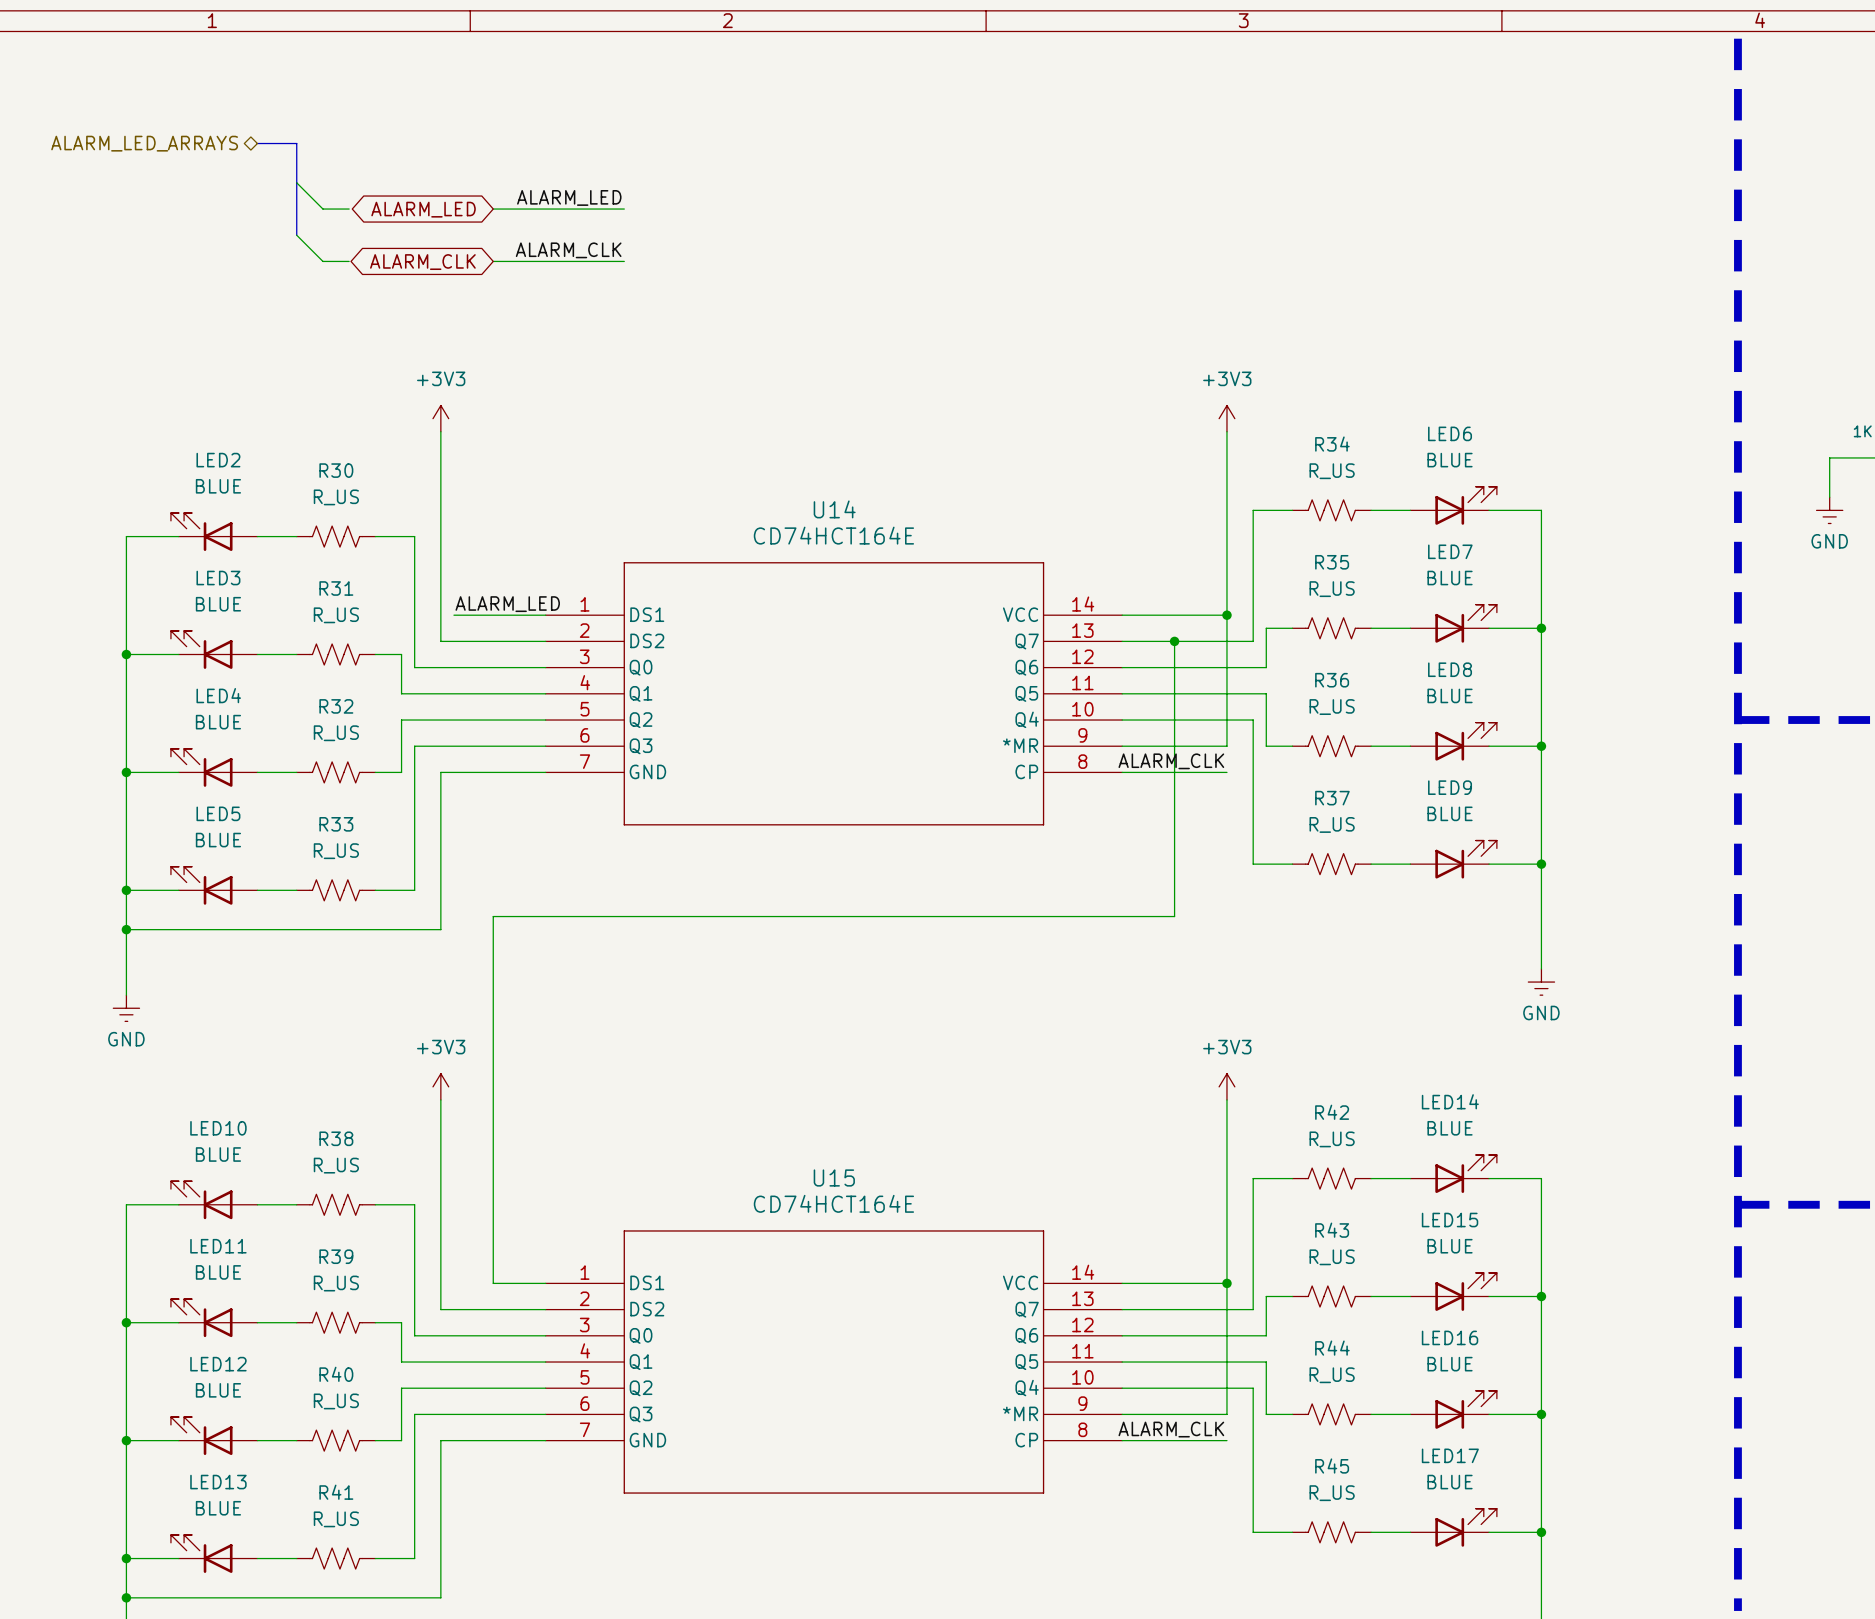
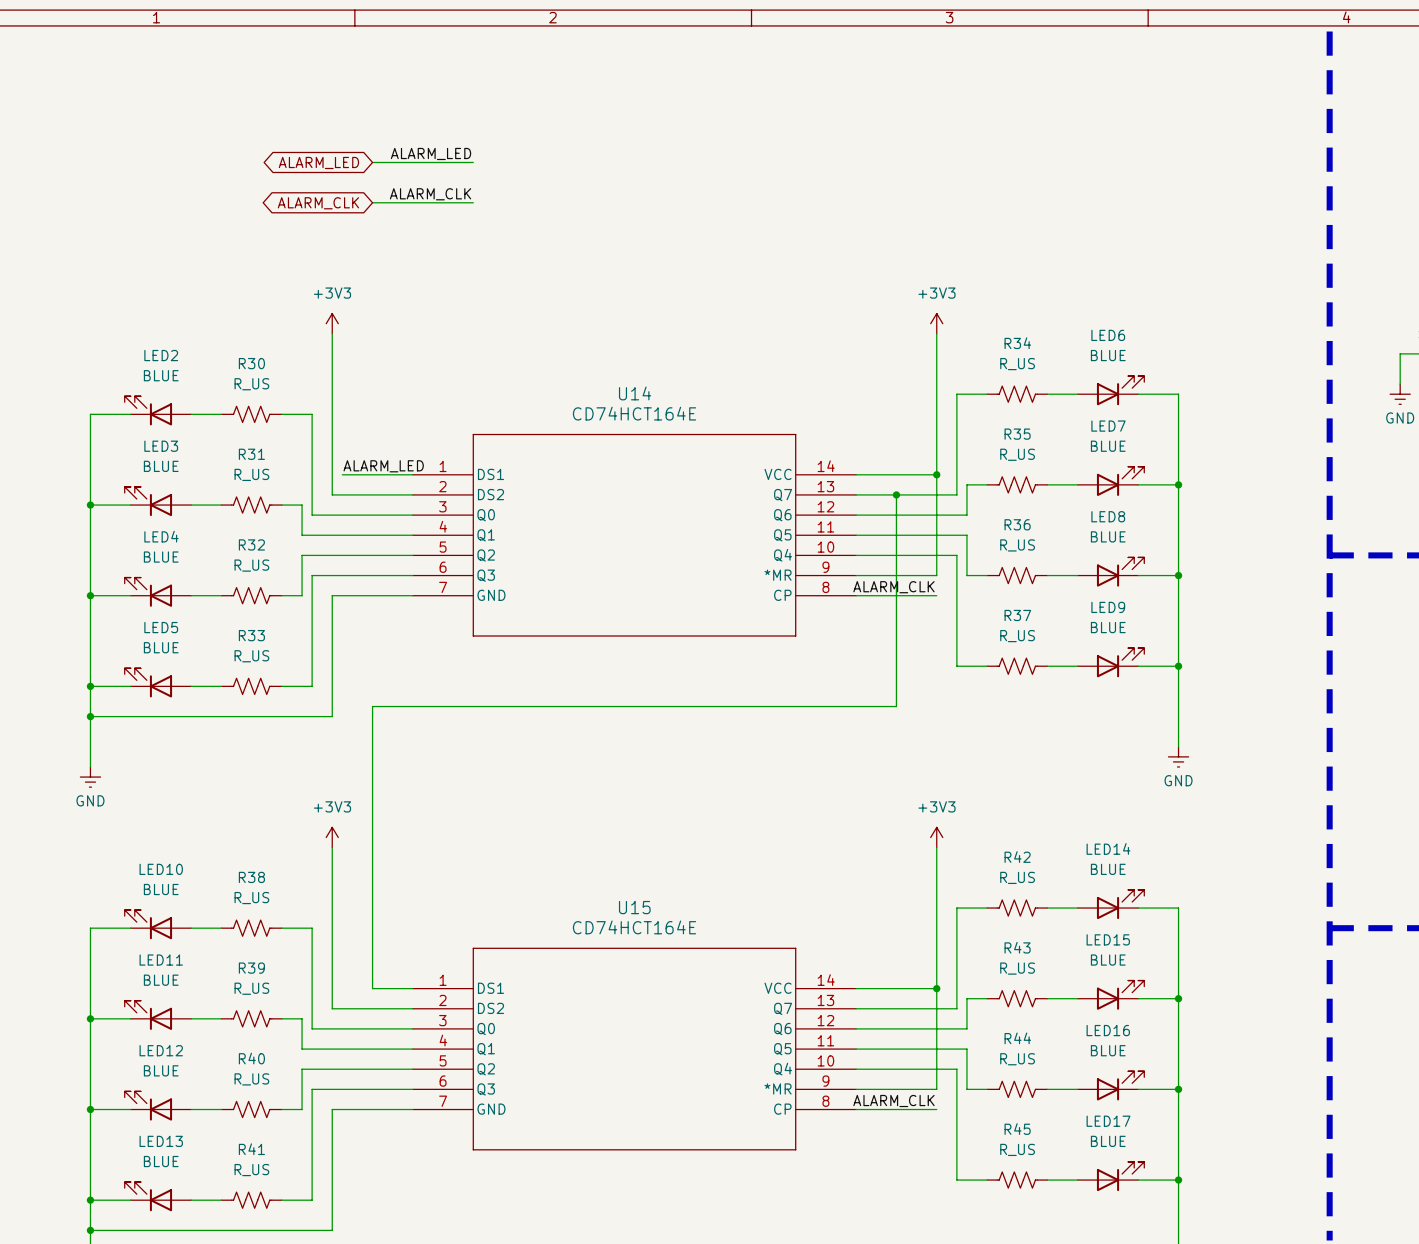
hierarchical label: ALARM_LED_ARRAYS (144, 143) -> none
bus: (257, 143) (296, 143) (296, 235) -> none
wire: (296, 182) (322, 209) (349, 209) -> none
wire: (296, 235) (322, 261) (349, 261) -> none

